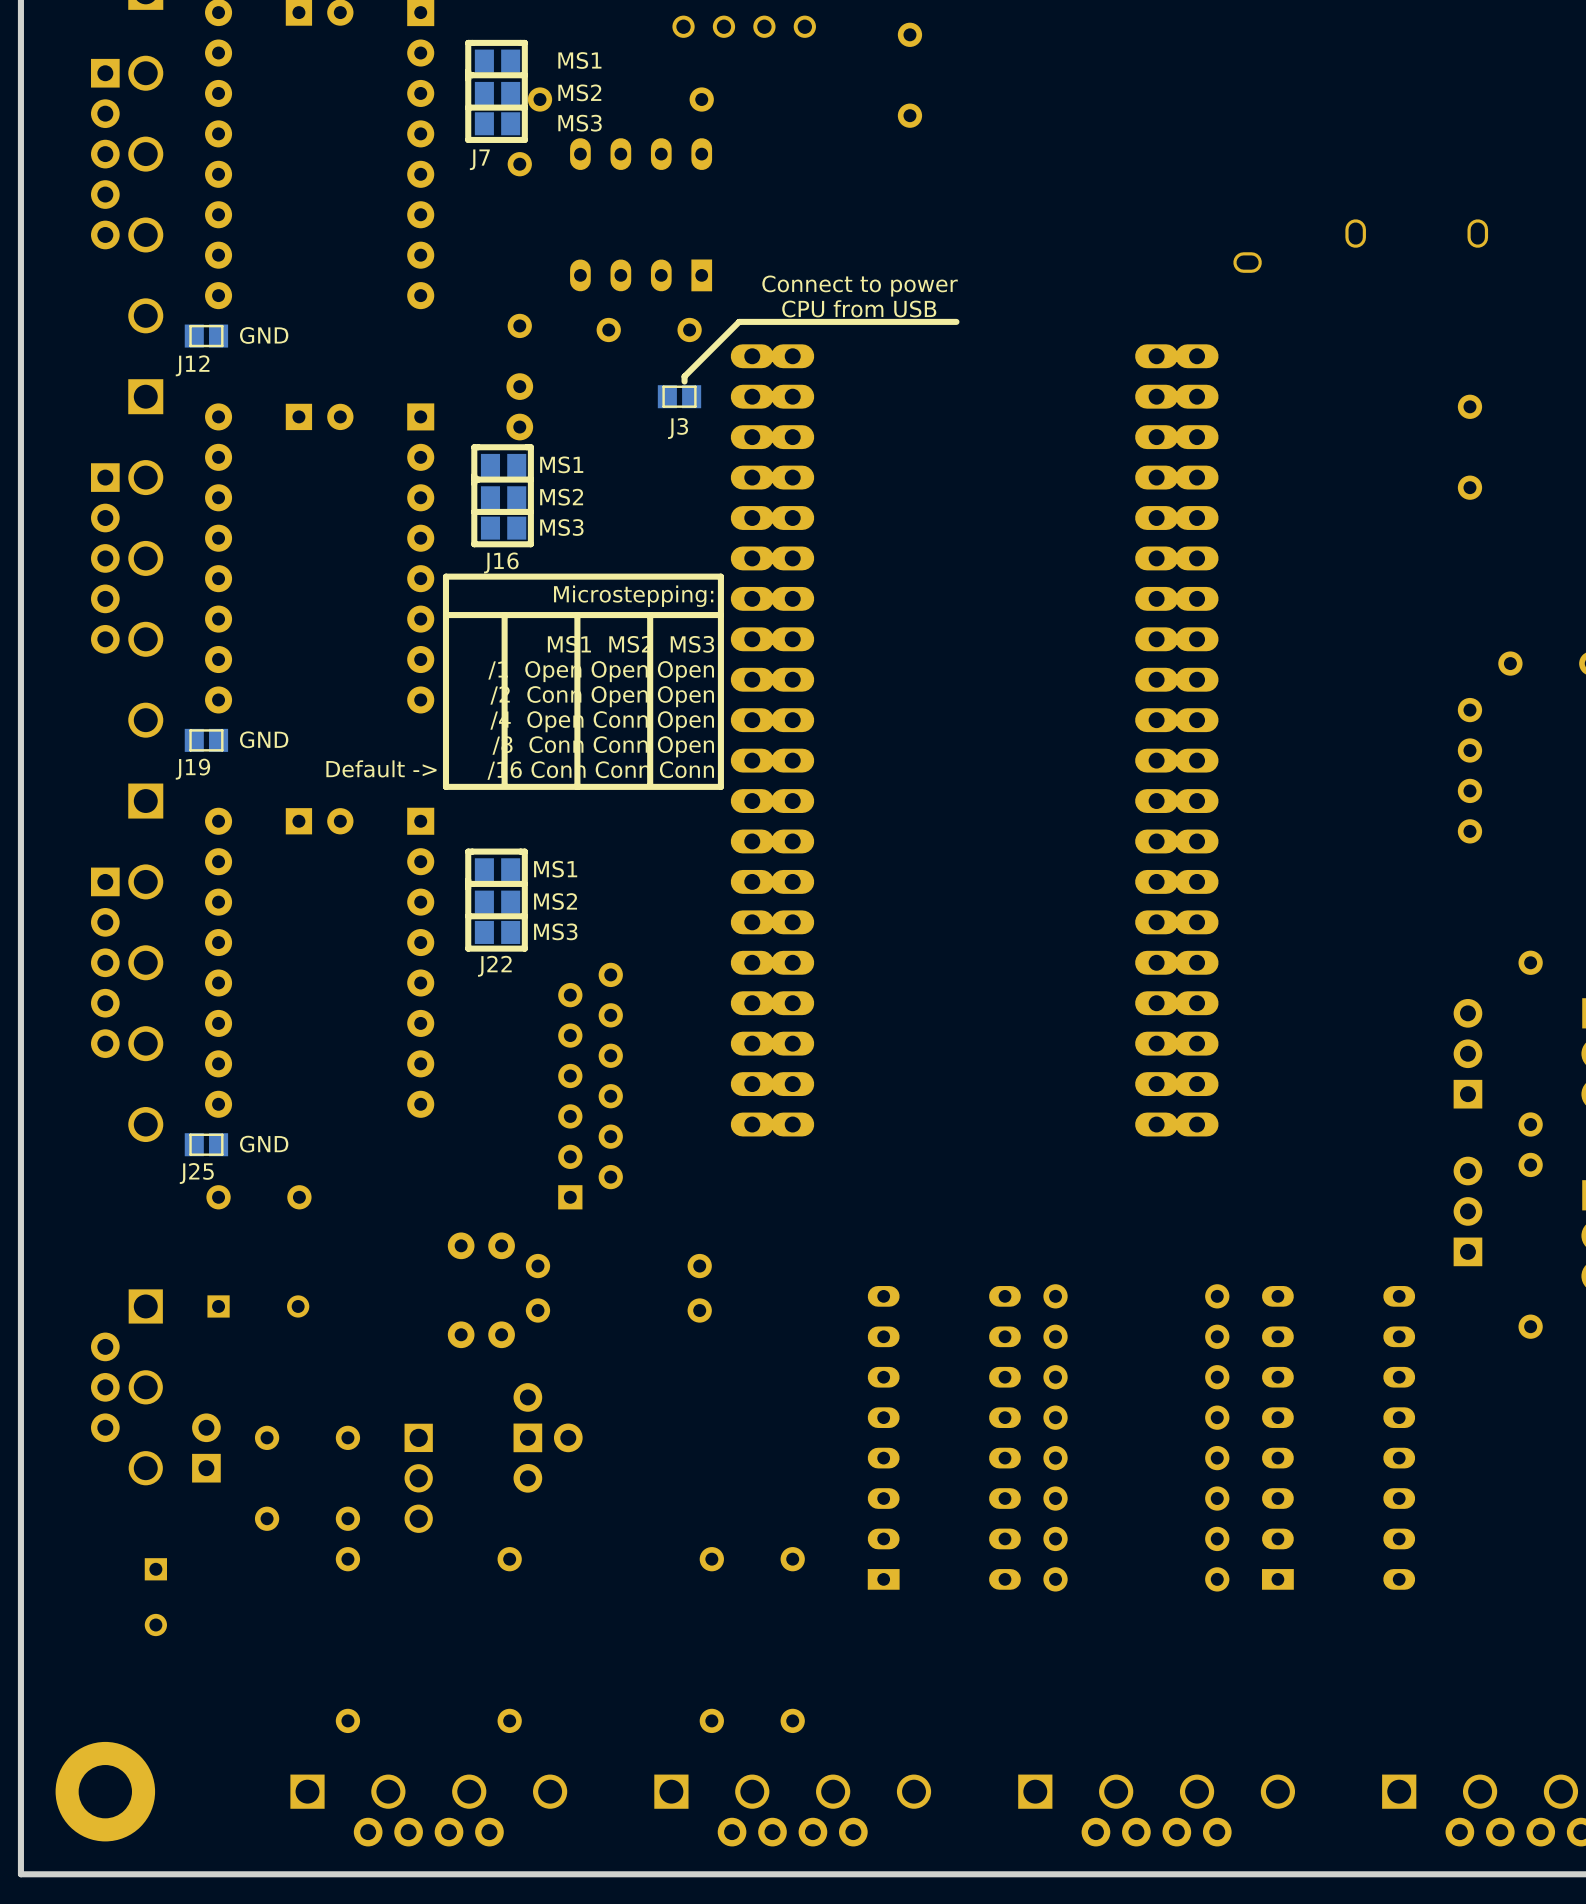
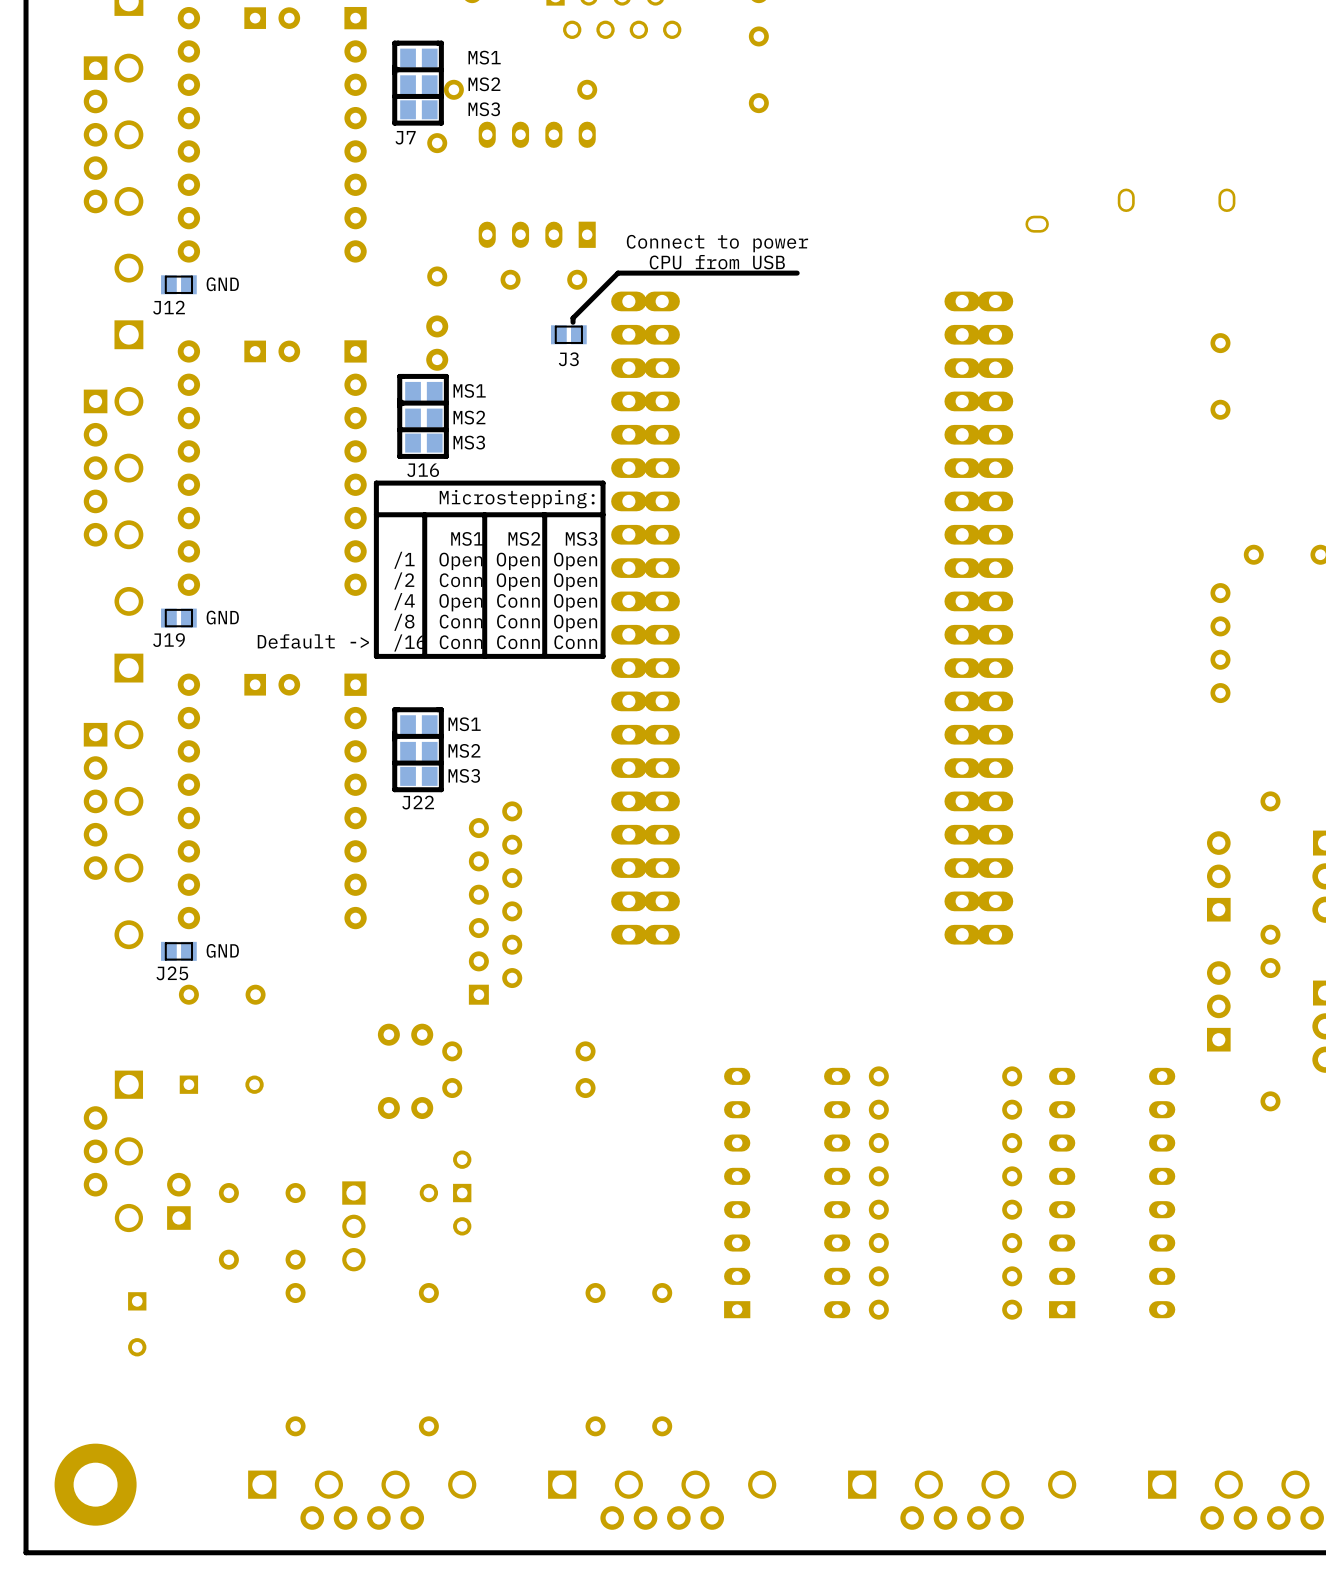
part: none -> (445, 1193)
part: (548, 1437) -> none

